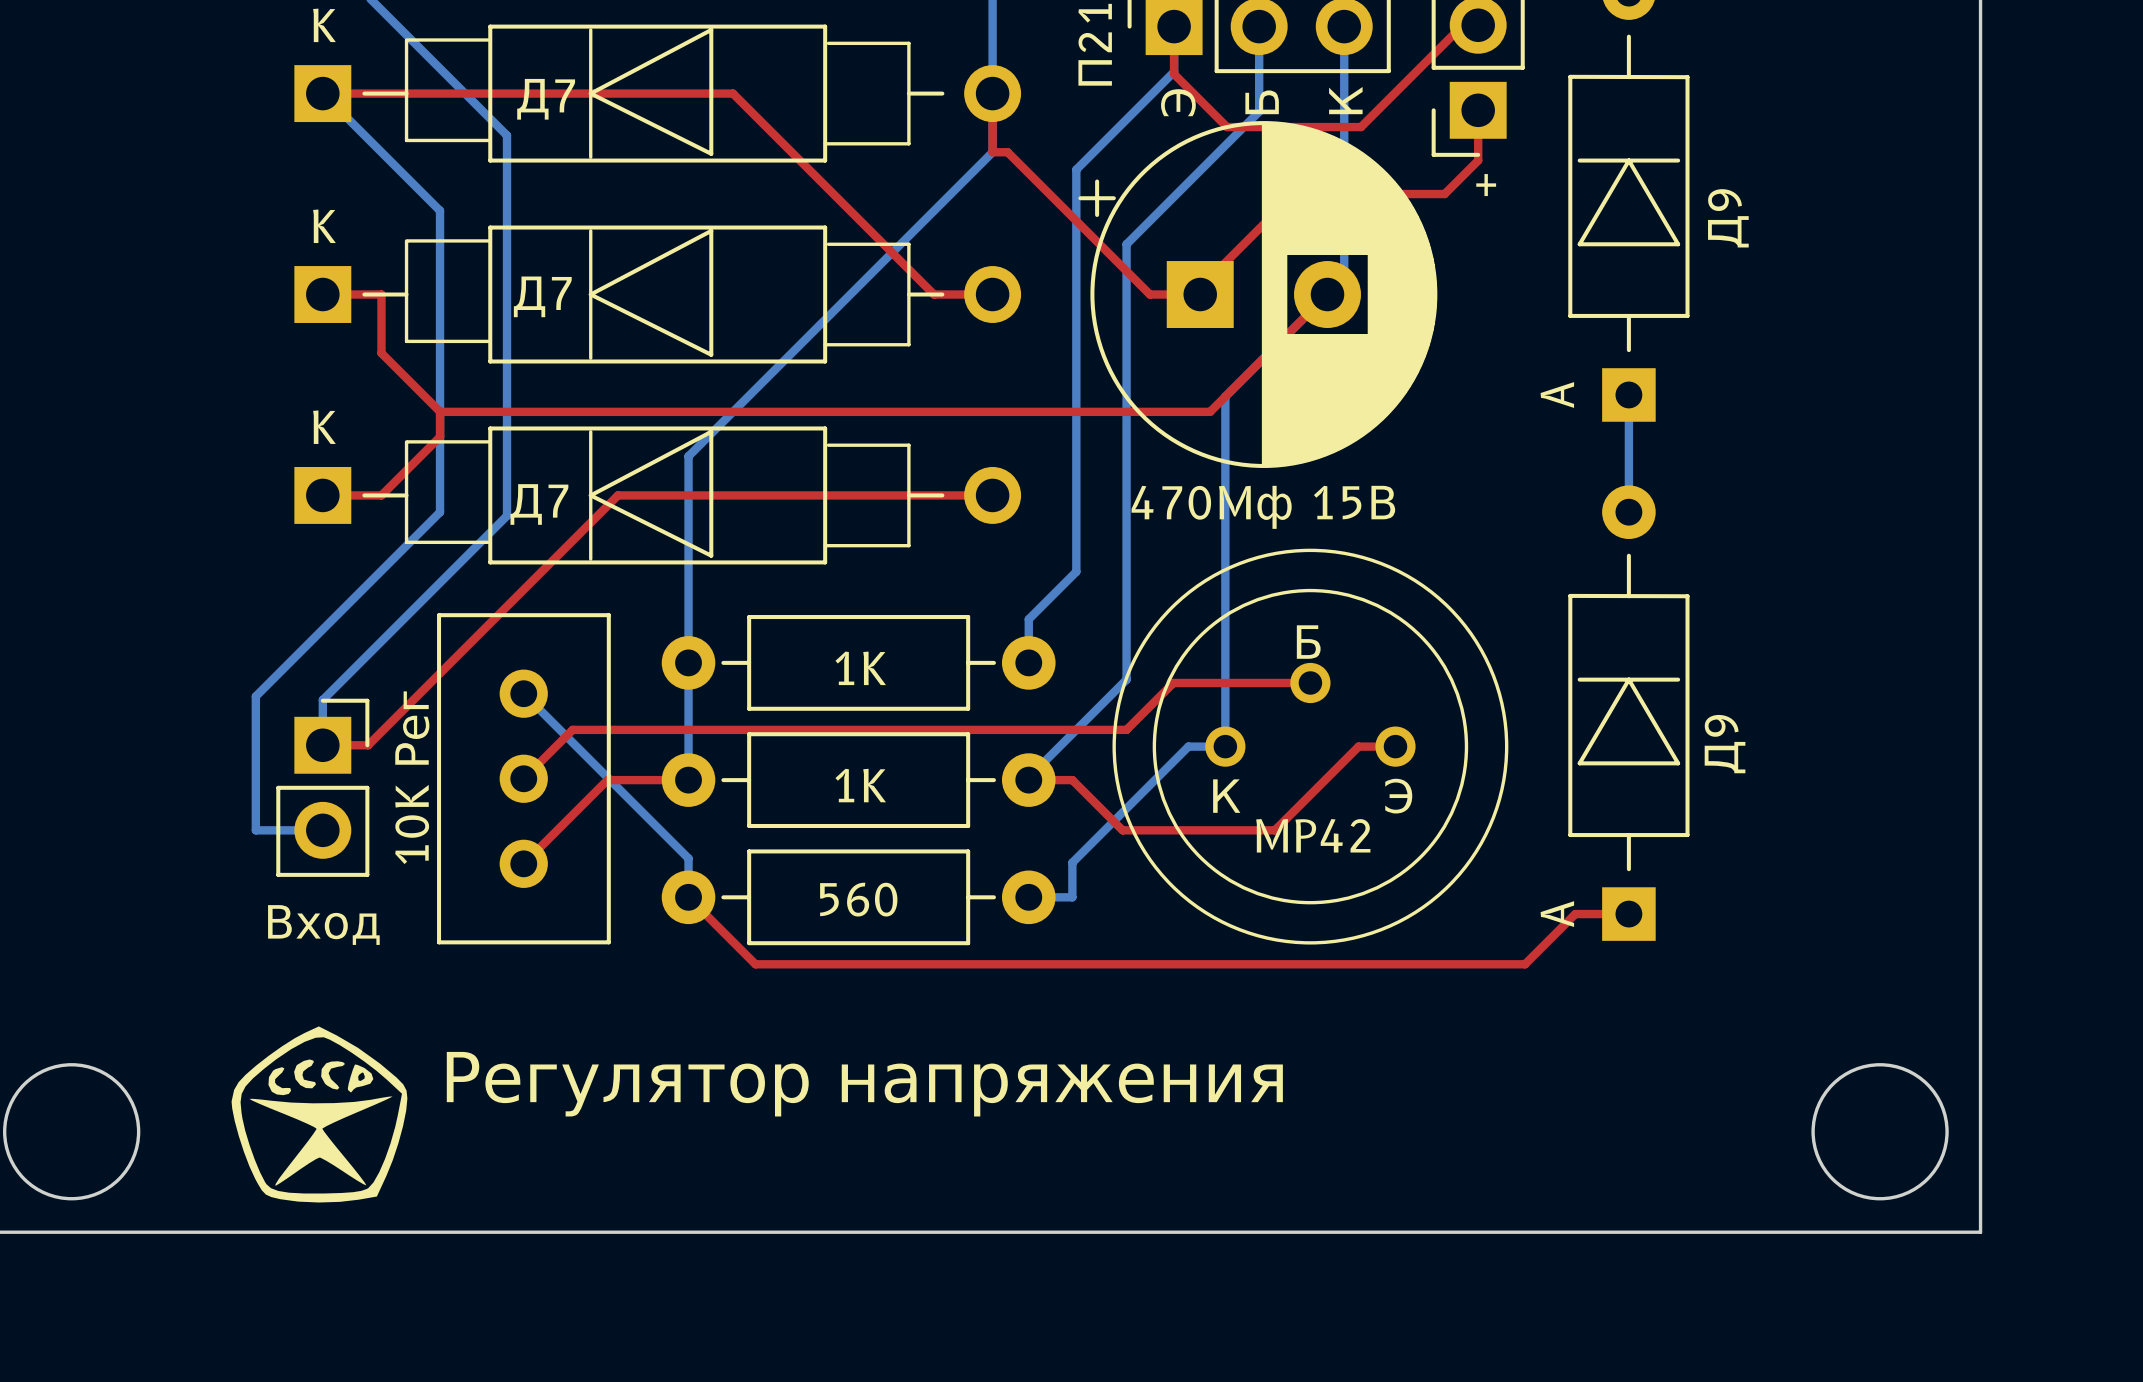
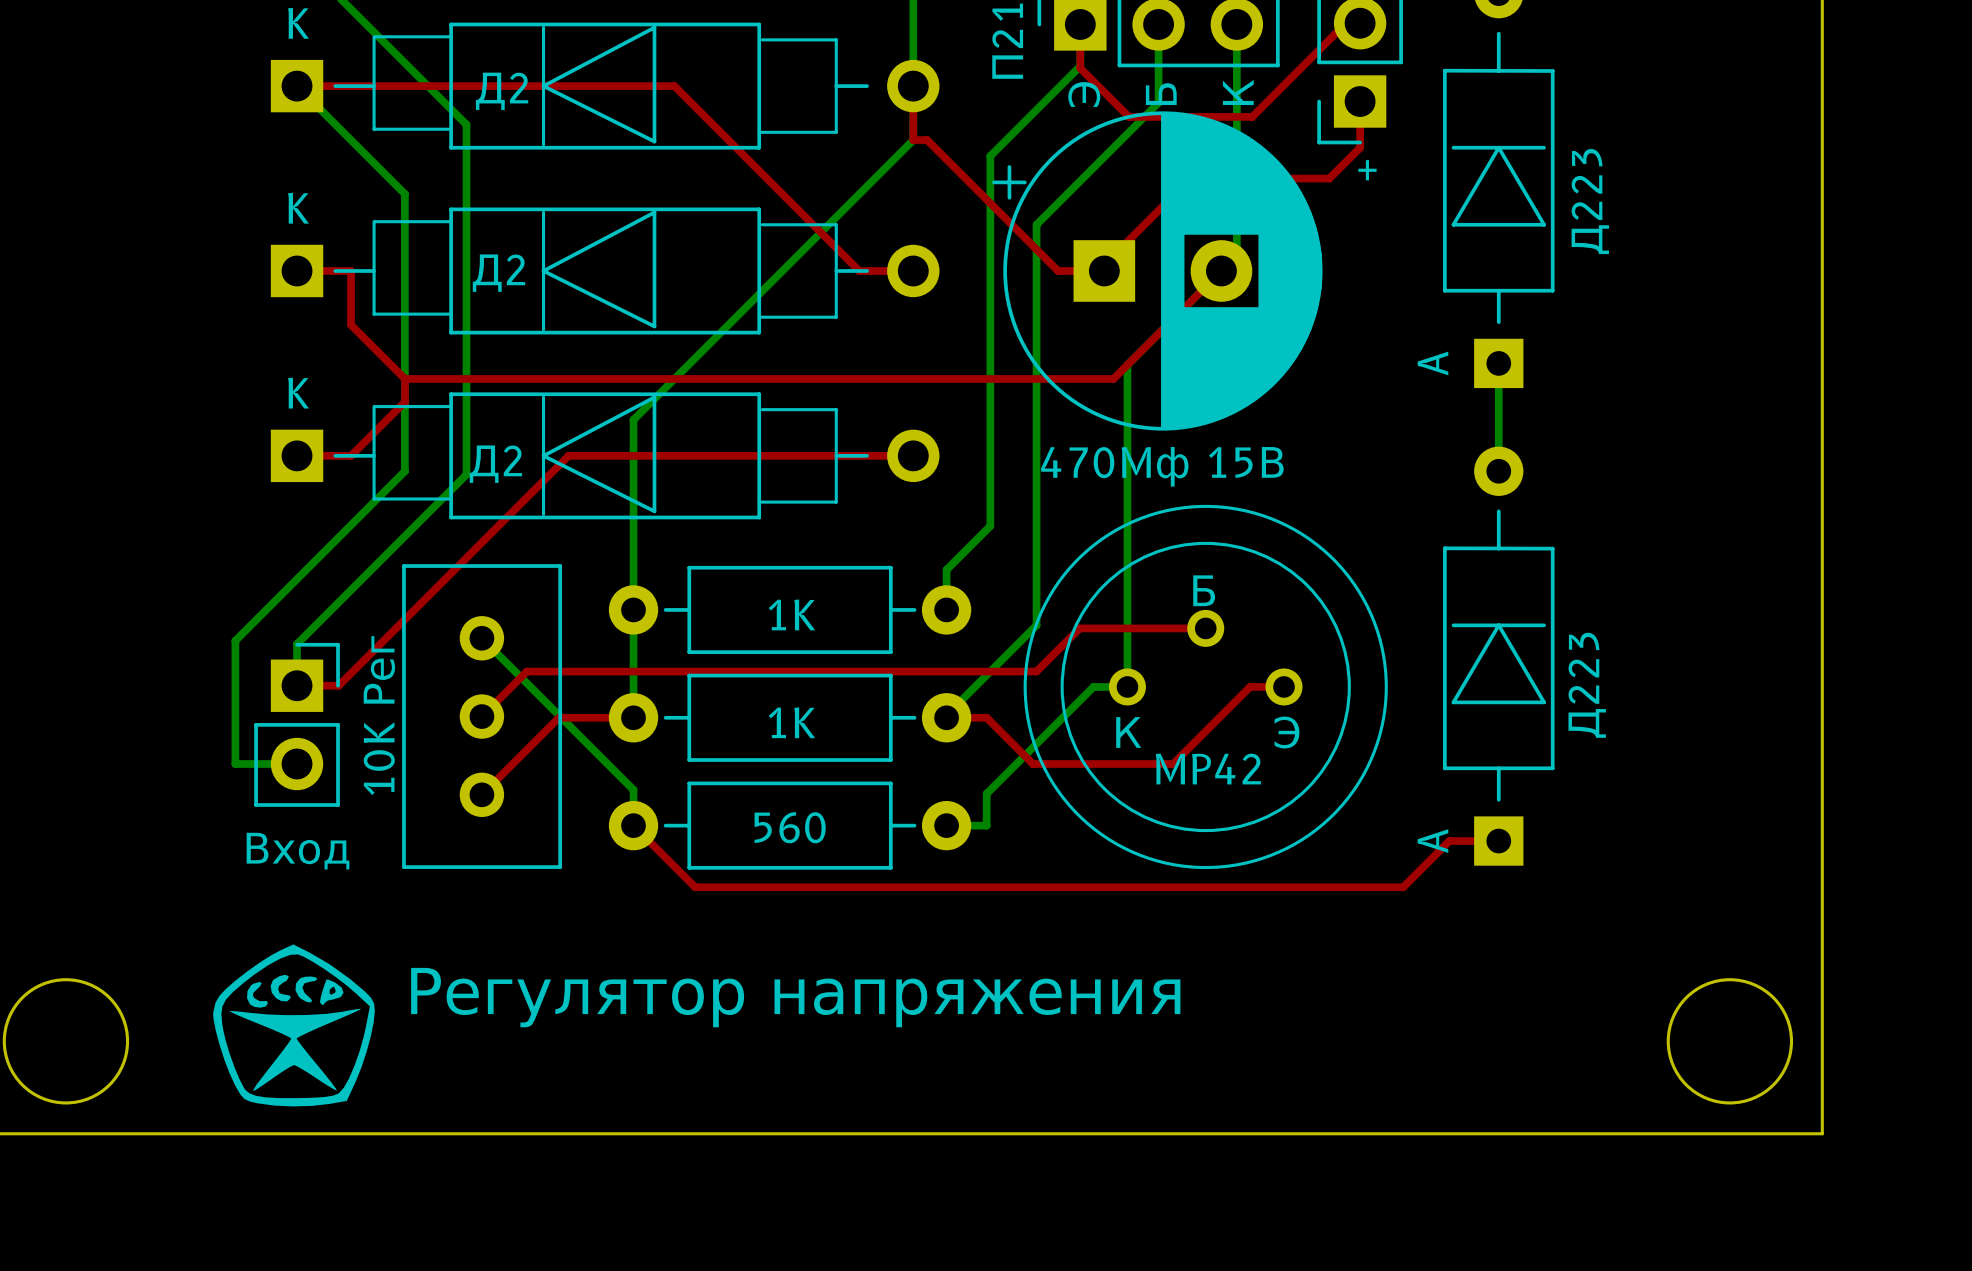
part value: Д7 (546, 99) -> Д2 (502, 91)
part value: Д9 (1728, 218) -> Д223 (1590, 201)
part value: Д7 (542, 296) -> Д2 (498, 273)
part value: Д7 (539, 504) -> Д2 (495, 464)
part value: Д9 (1725, 744) -> Д223 (1587, 685)

